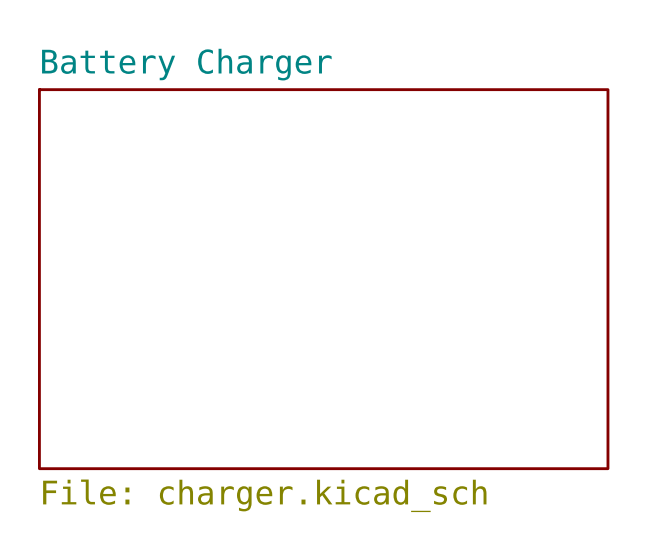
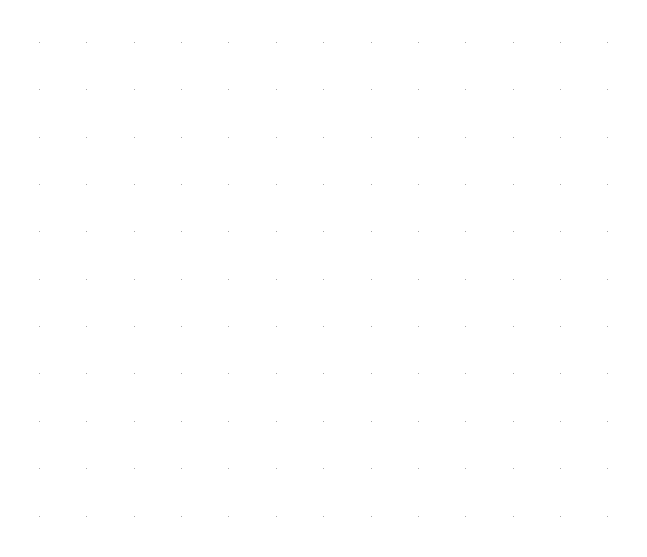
sheet Battery Charger: File: charger.kicad_sch (323, 279) -> none

